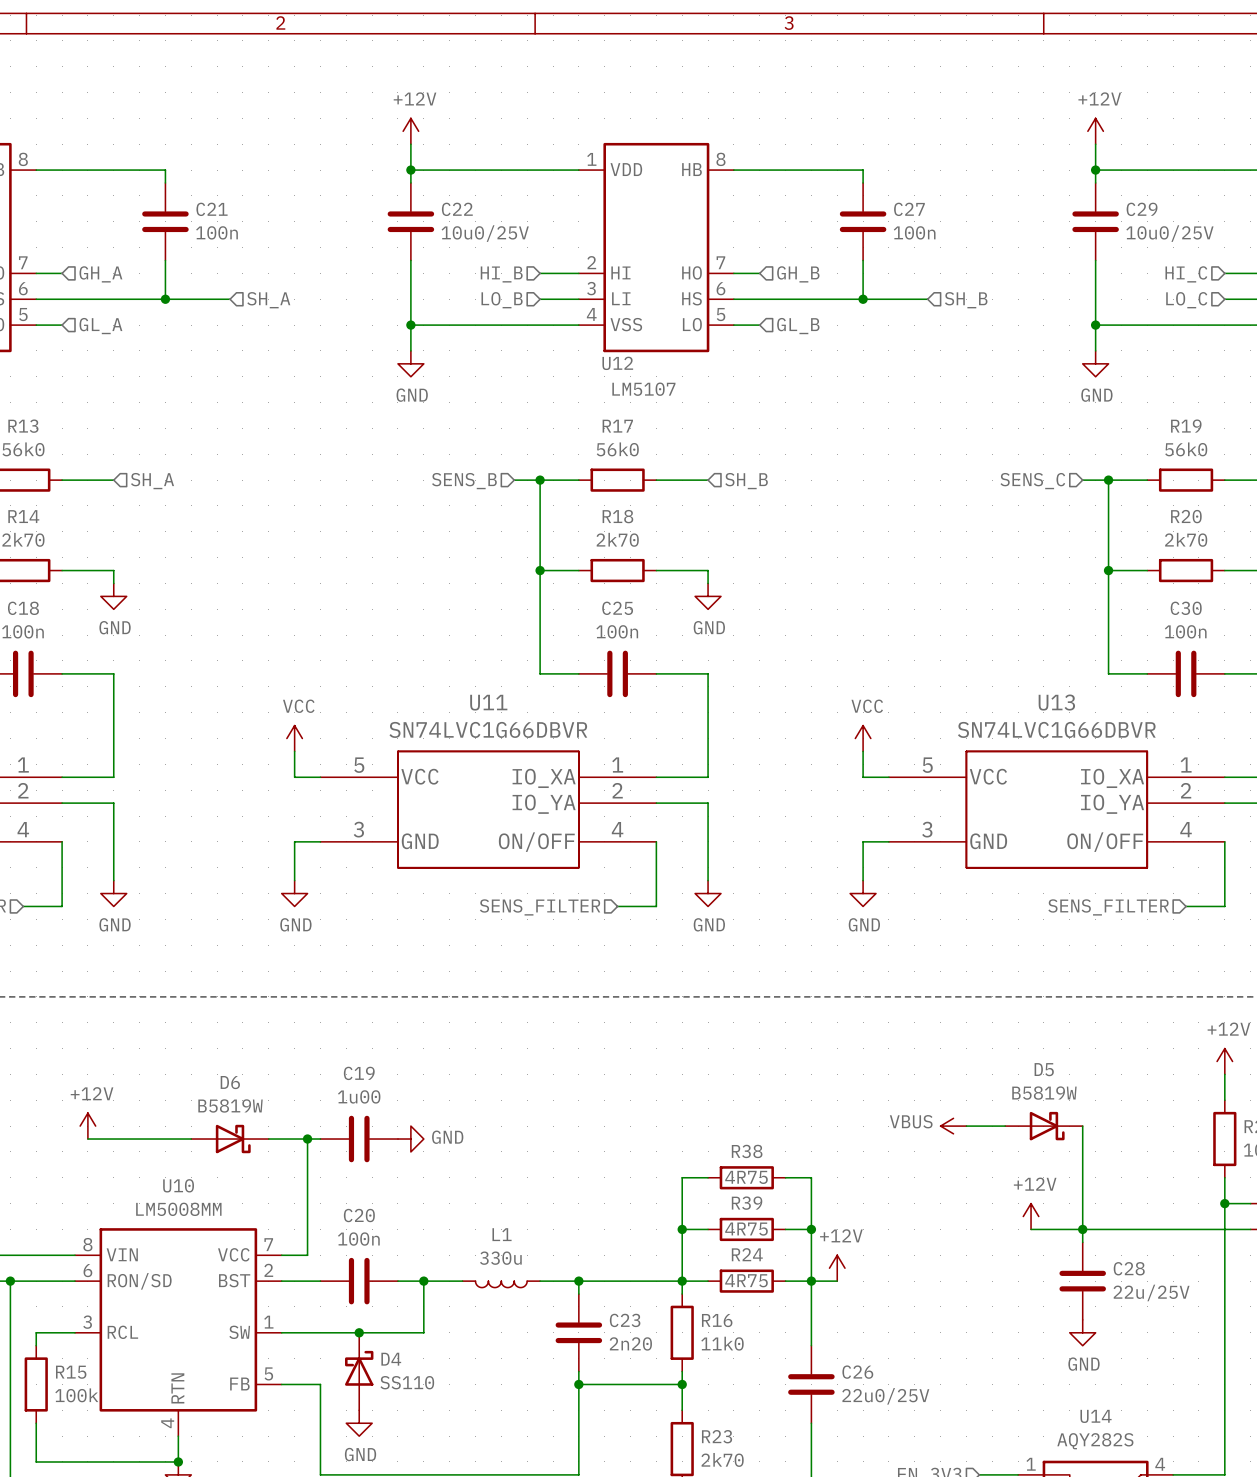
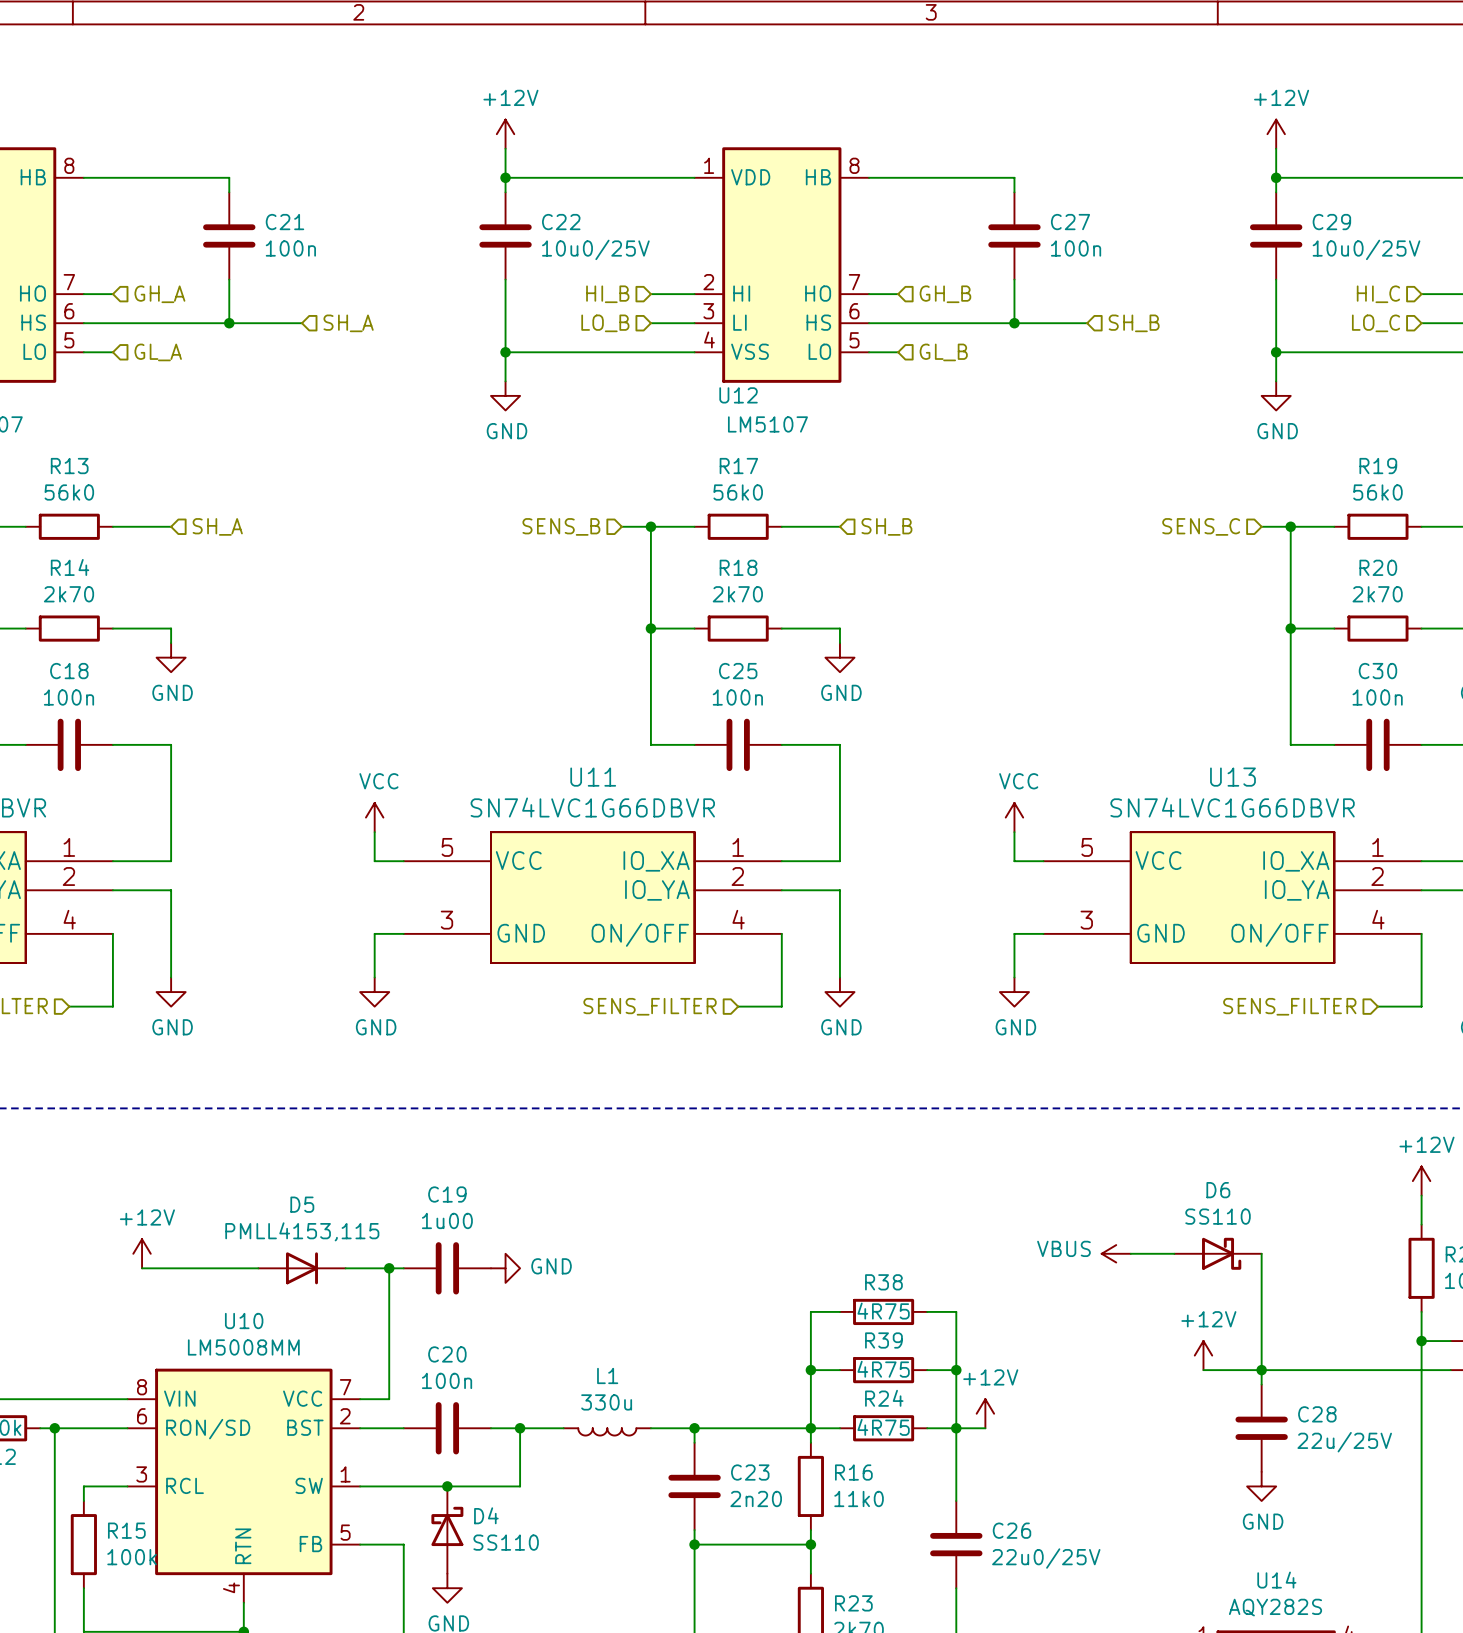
D5 name: D5 (1044, 1069) -> D6 (1218, 1190)
D5 value: B5819W (1044, 1093) -> SS110 (1218, 1216)
D6: B5819W (230, 1139) -> none
D5: none -> PMLL4153,115 (301, 1268)

